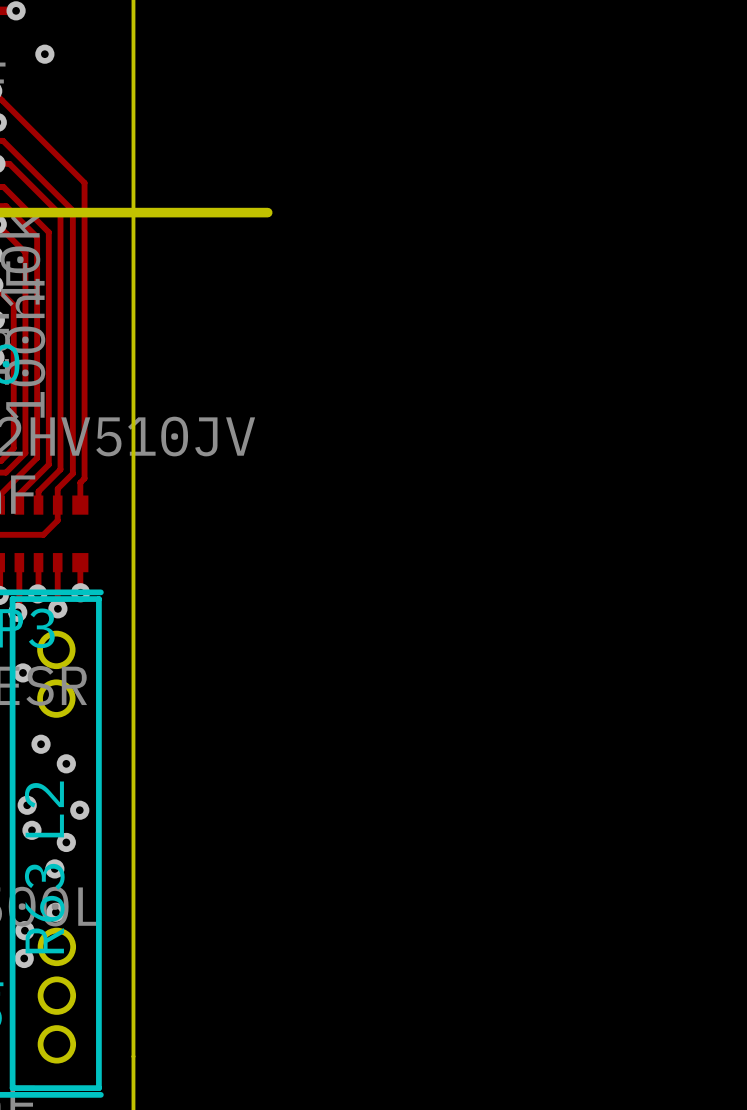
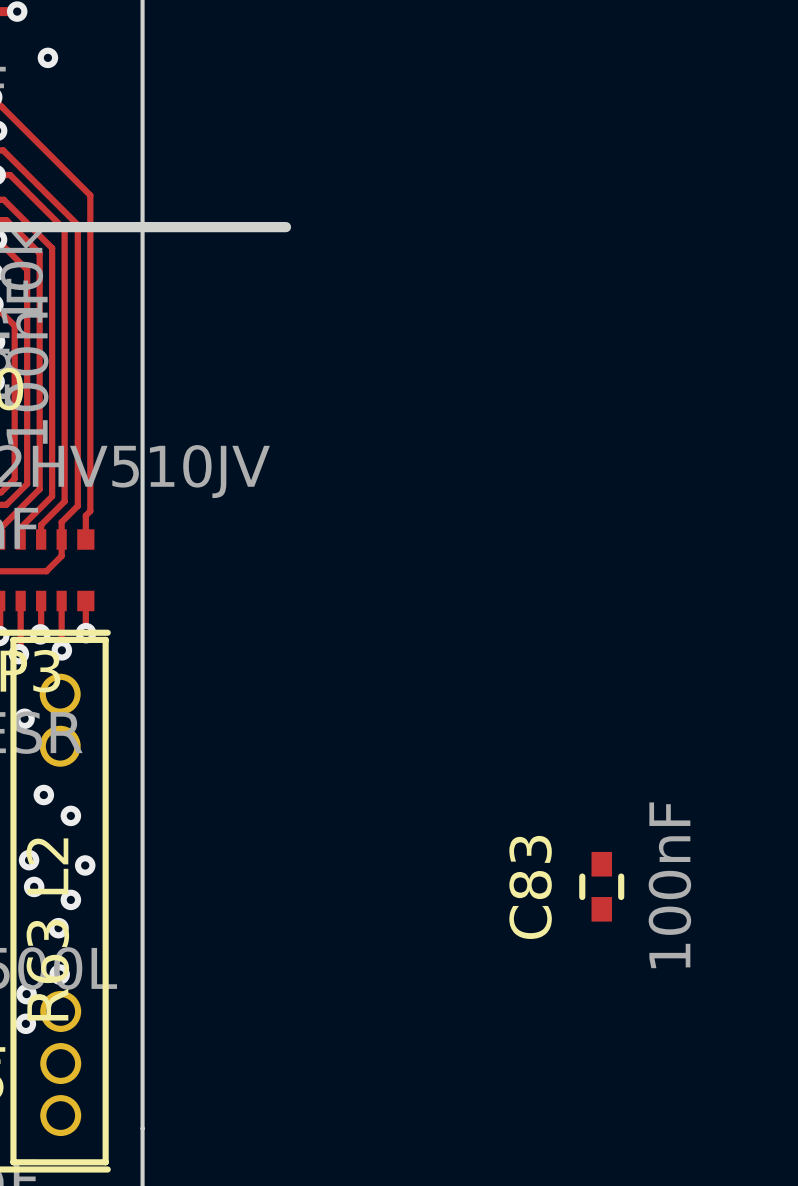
C83: none -> 100nF (601, 886)

